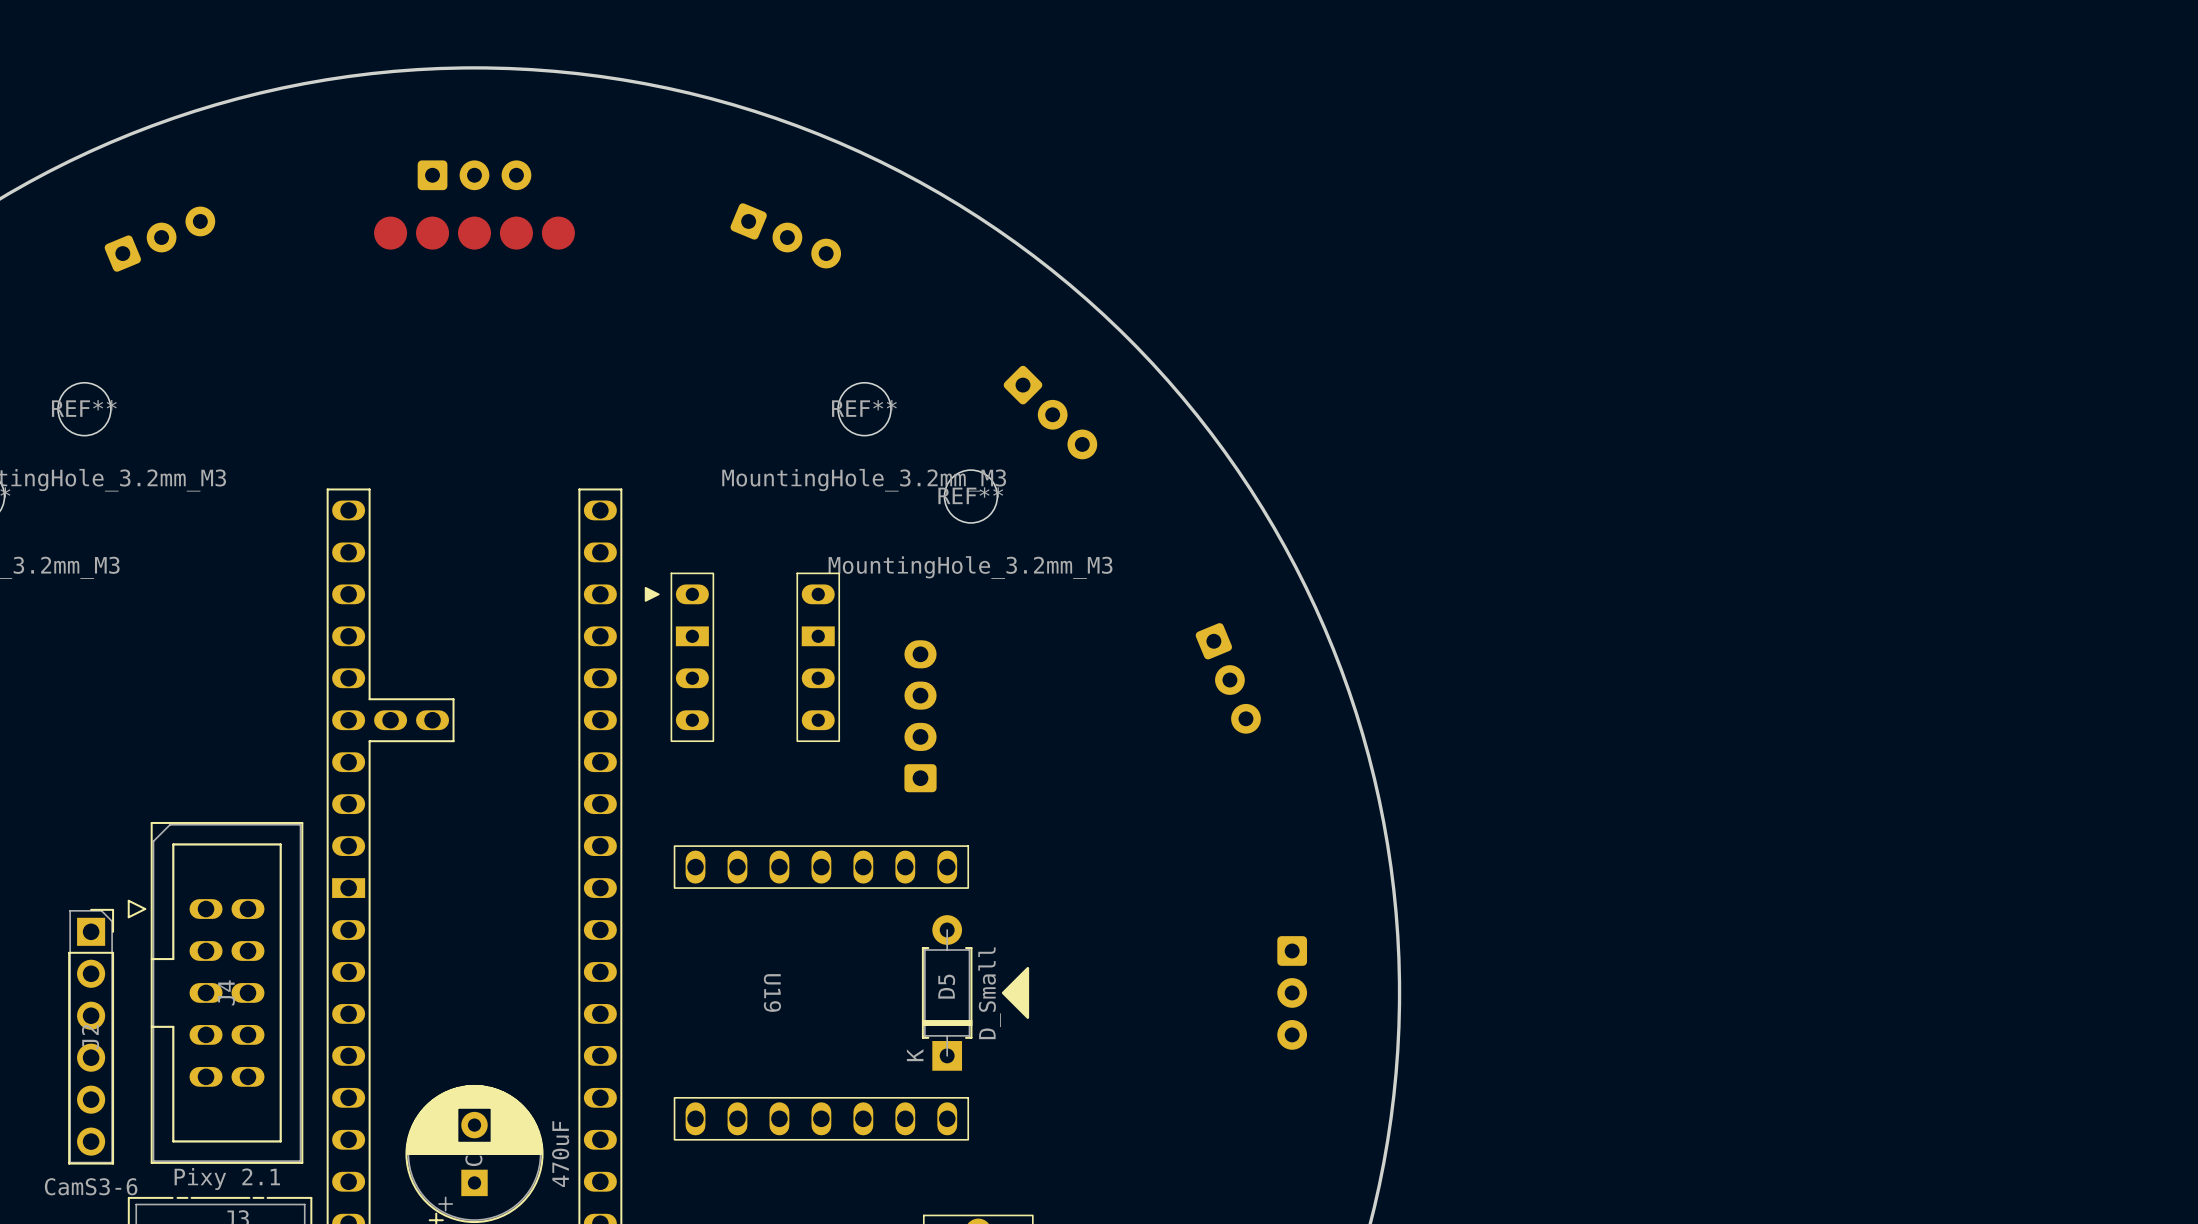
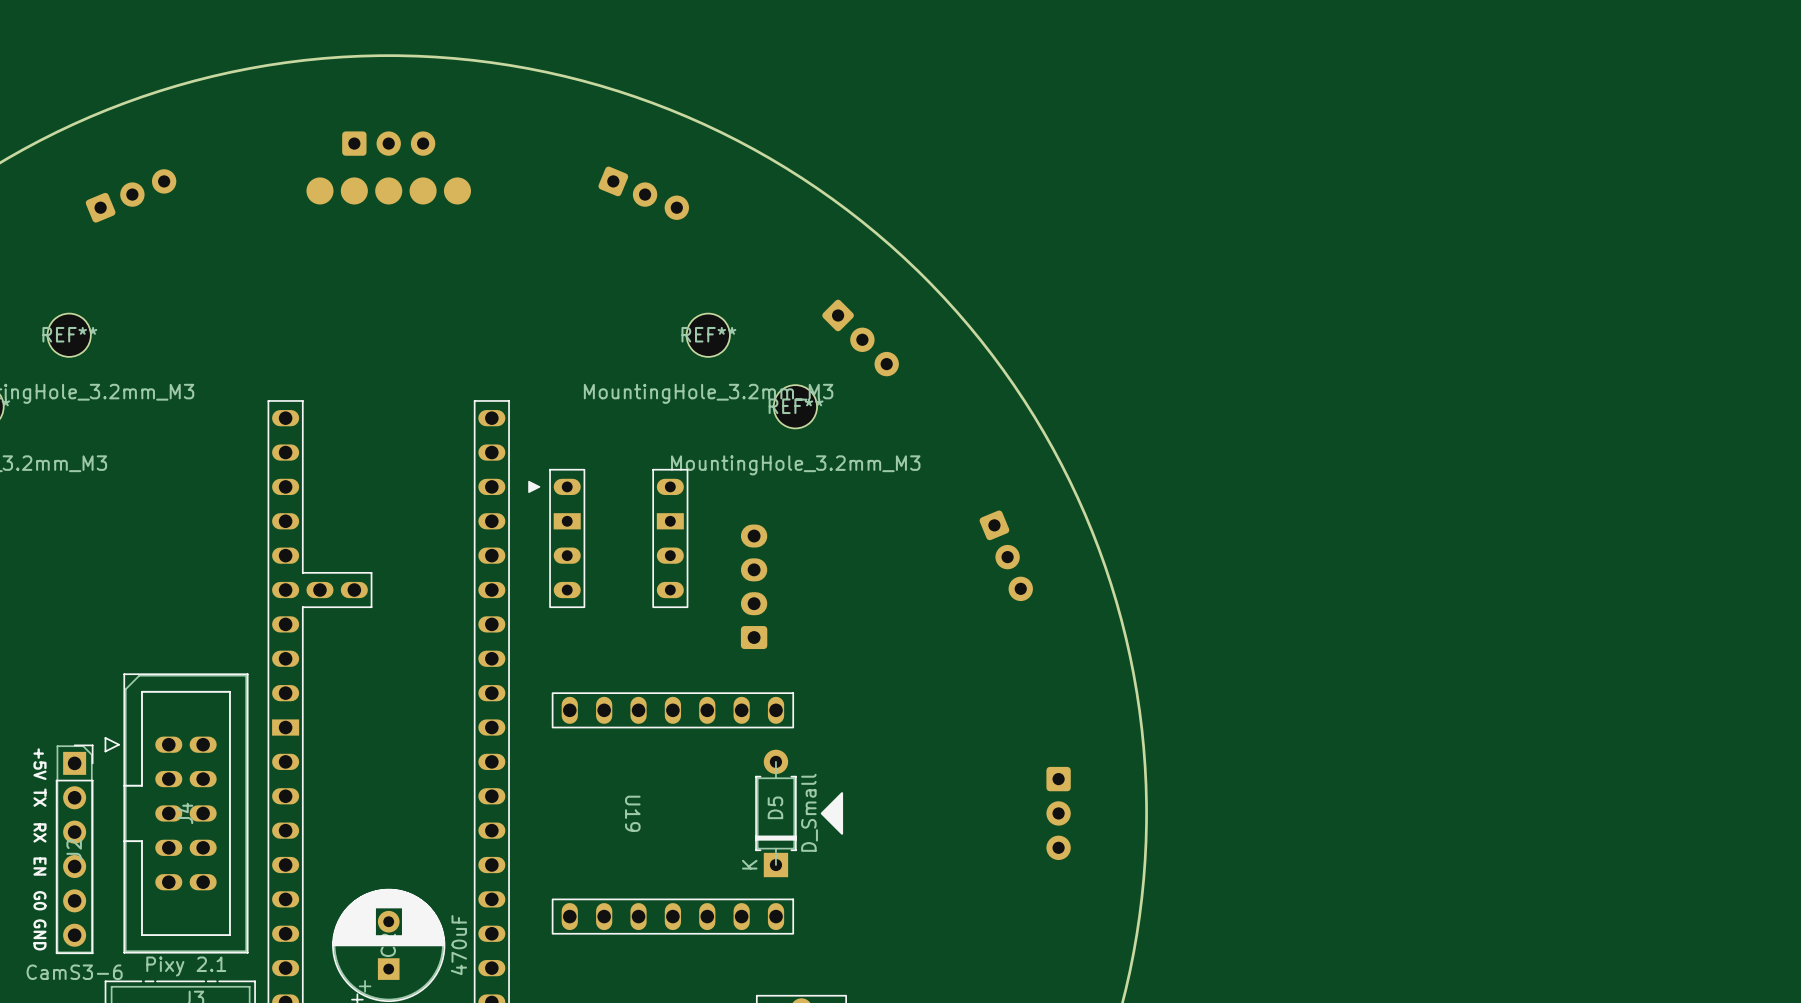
text: none -> +5V (39, 764)
text: none -> TX (39, 797)
text: none -> RX (39, 832)
text: none -> EN (39, 866)
text: none -> G0 (39, 900)
text: none -> GND (39, 934)

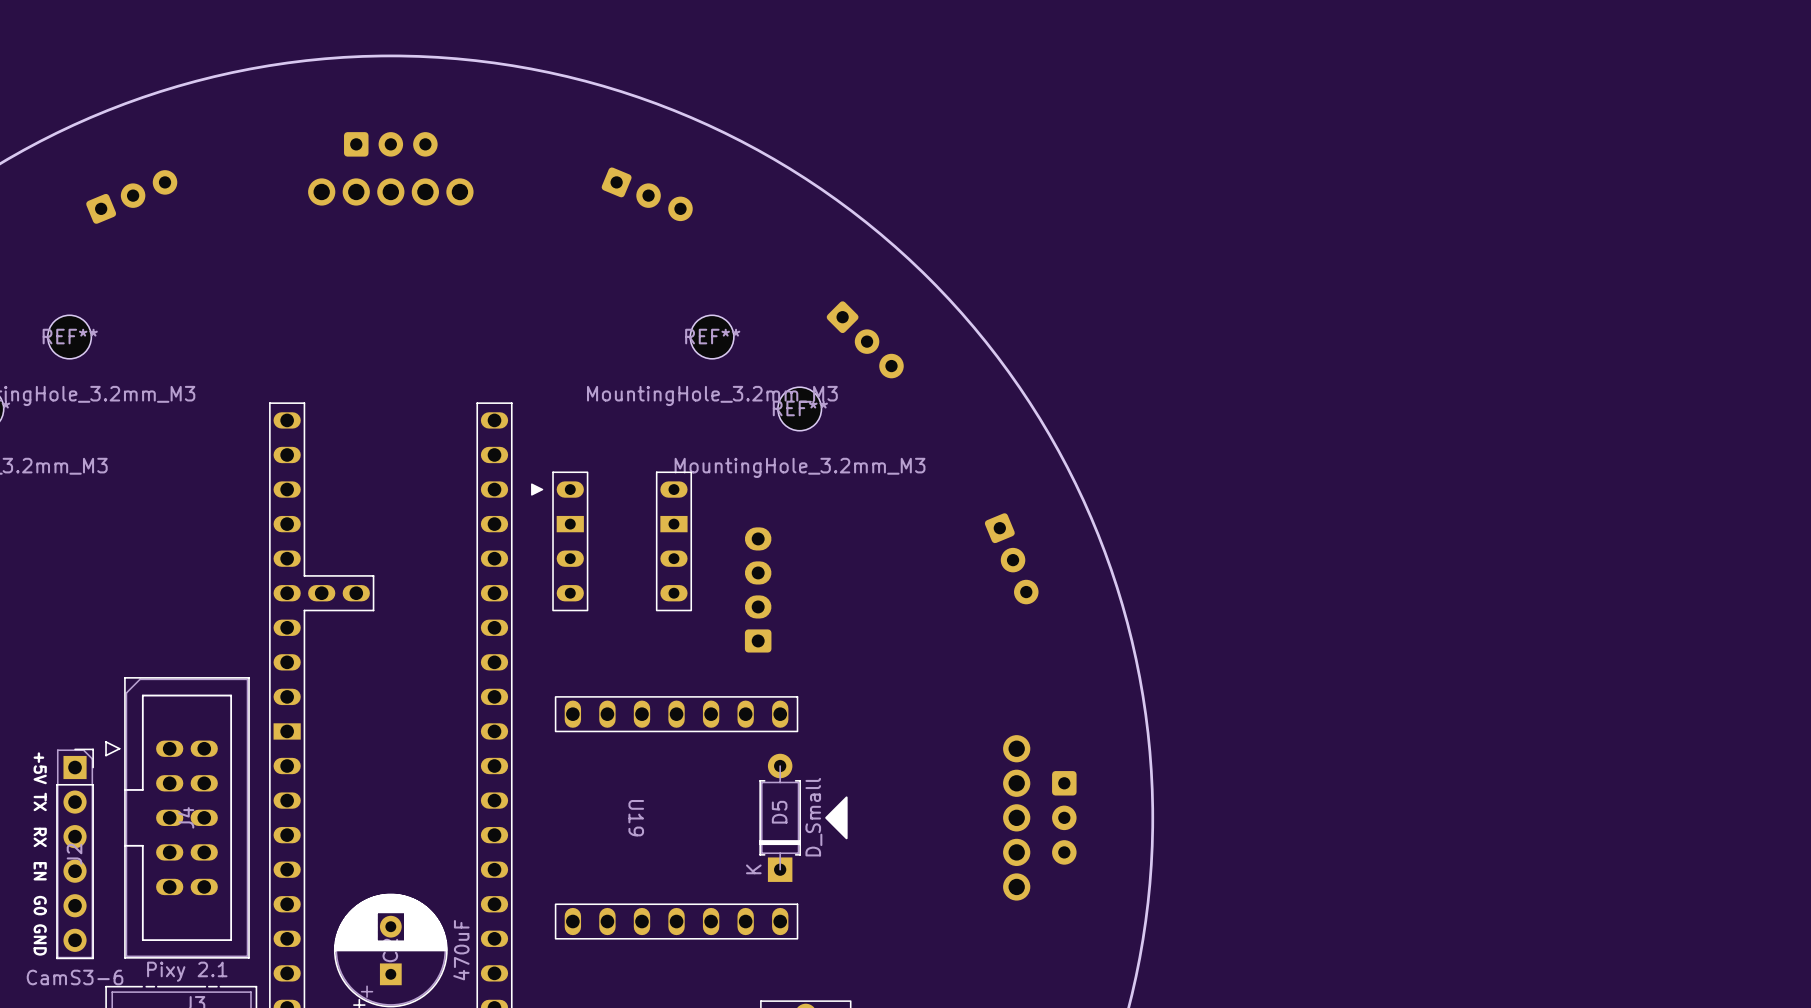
part footprint: [306, 177, 472, 205] -> [308, 178, 474, 206]
part: none -> (1016, 817)

